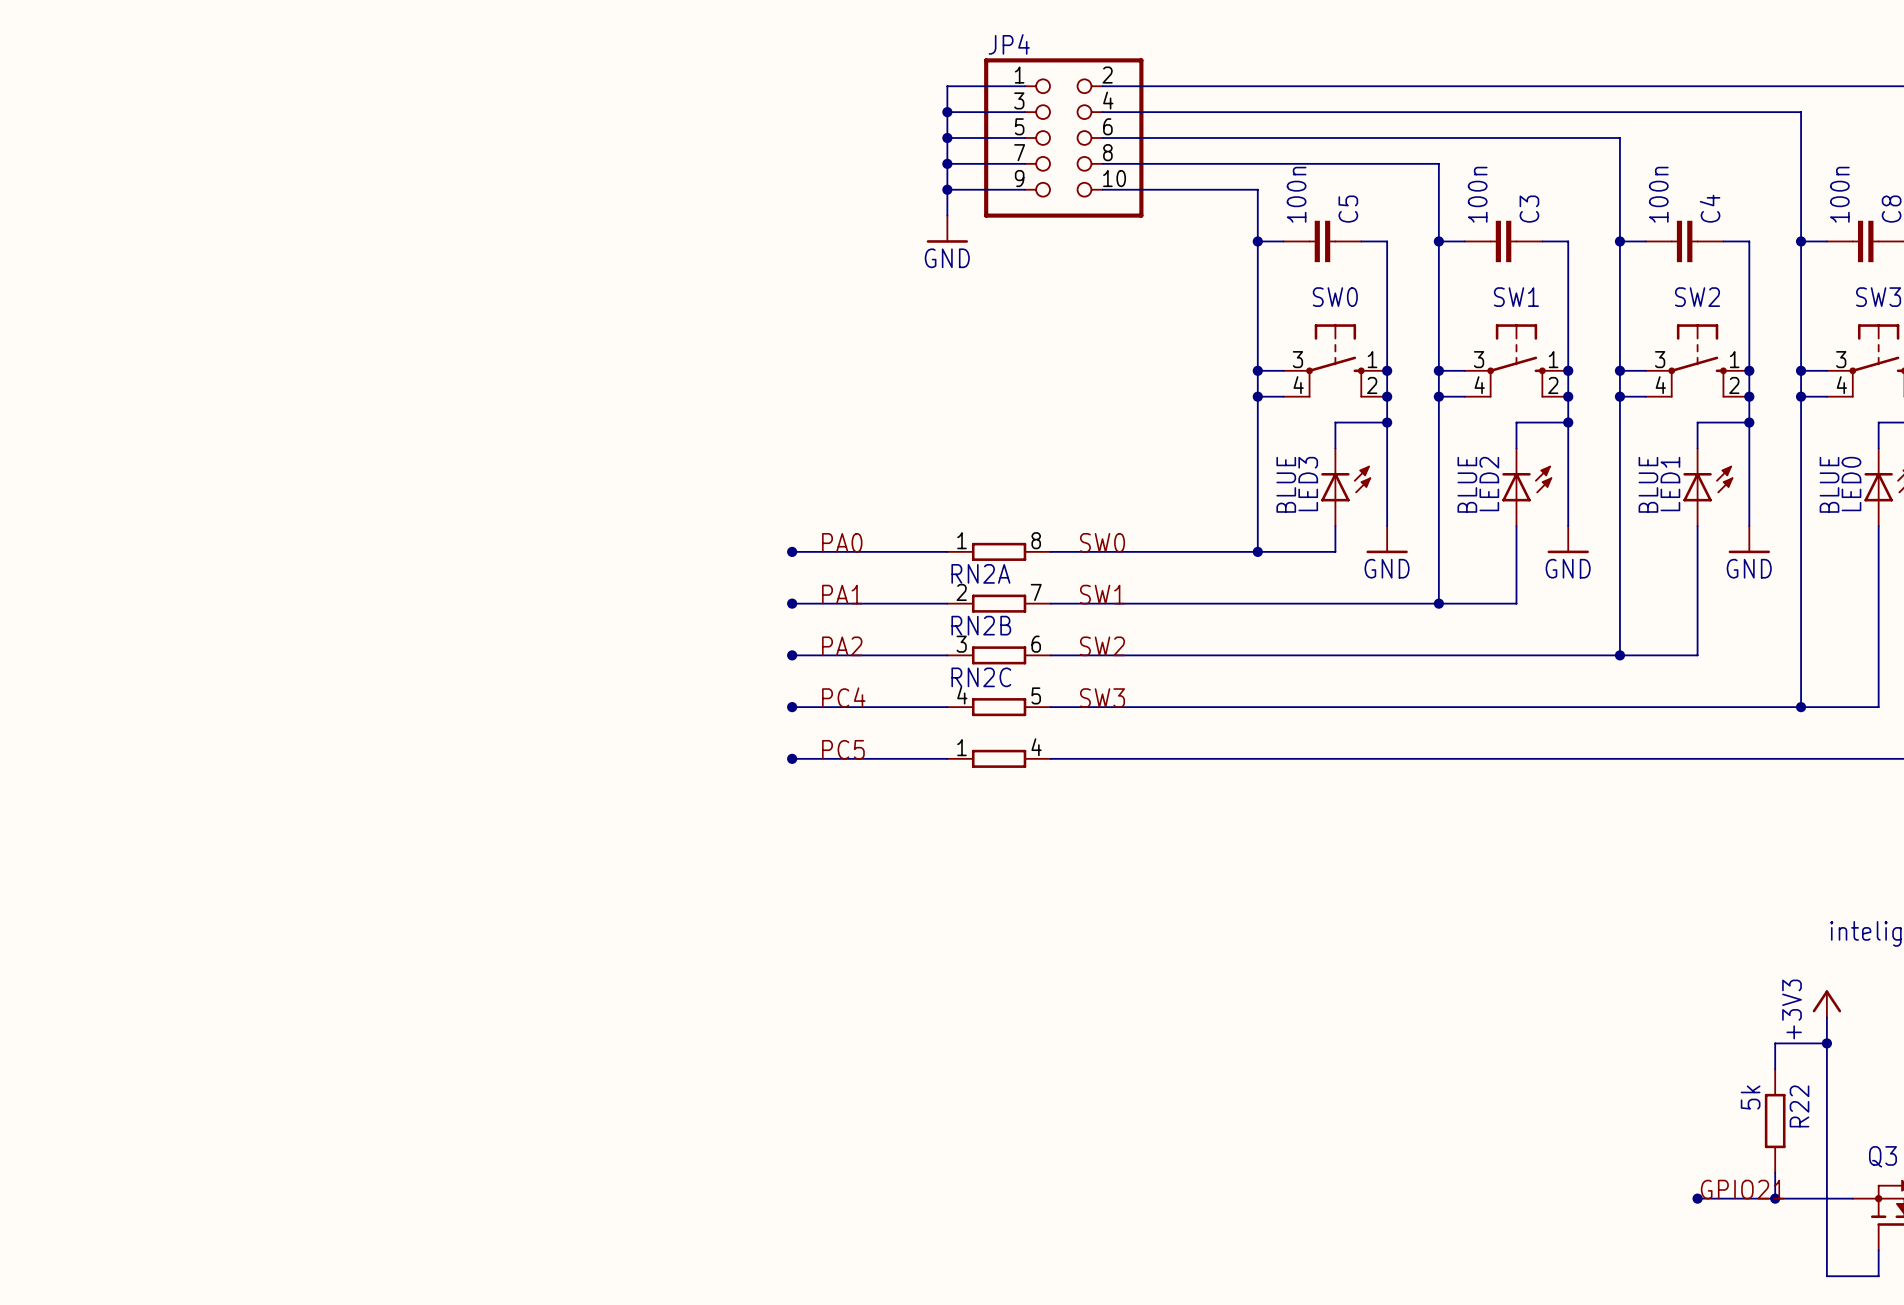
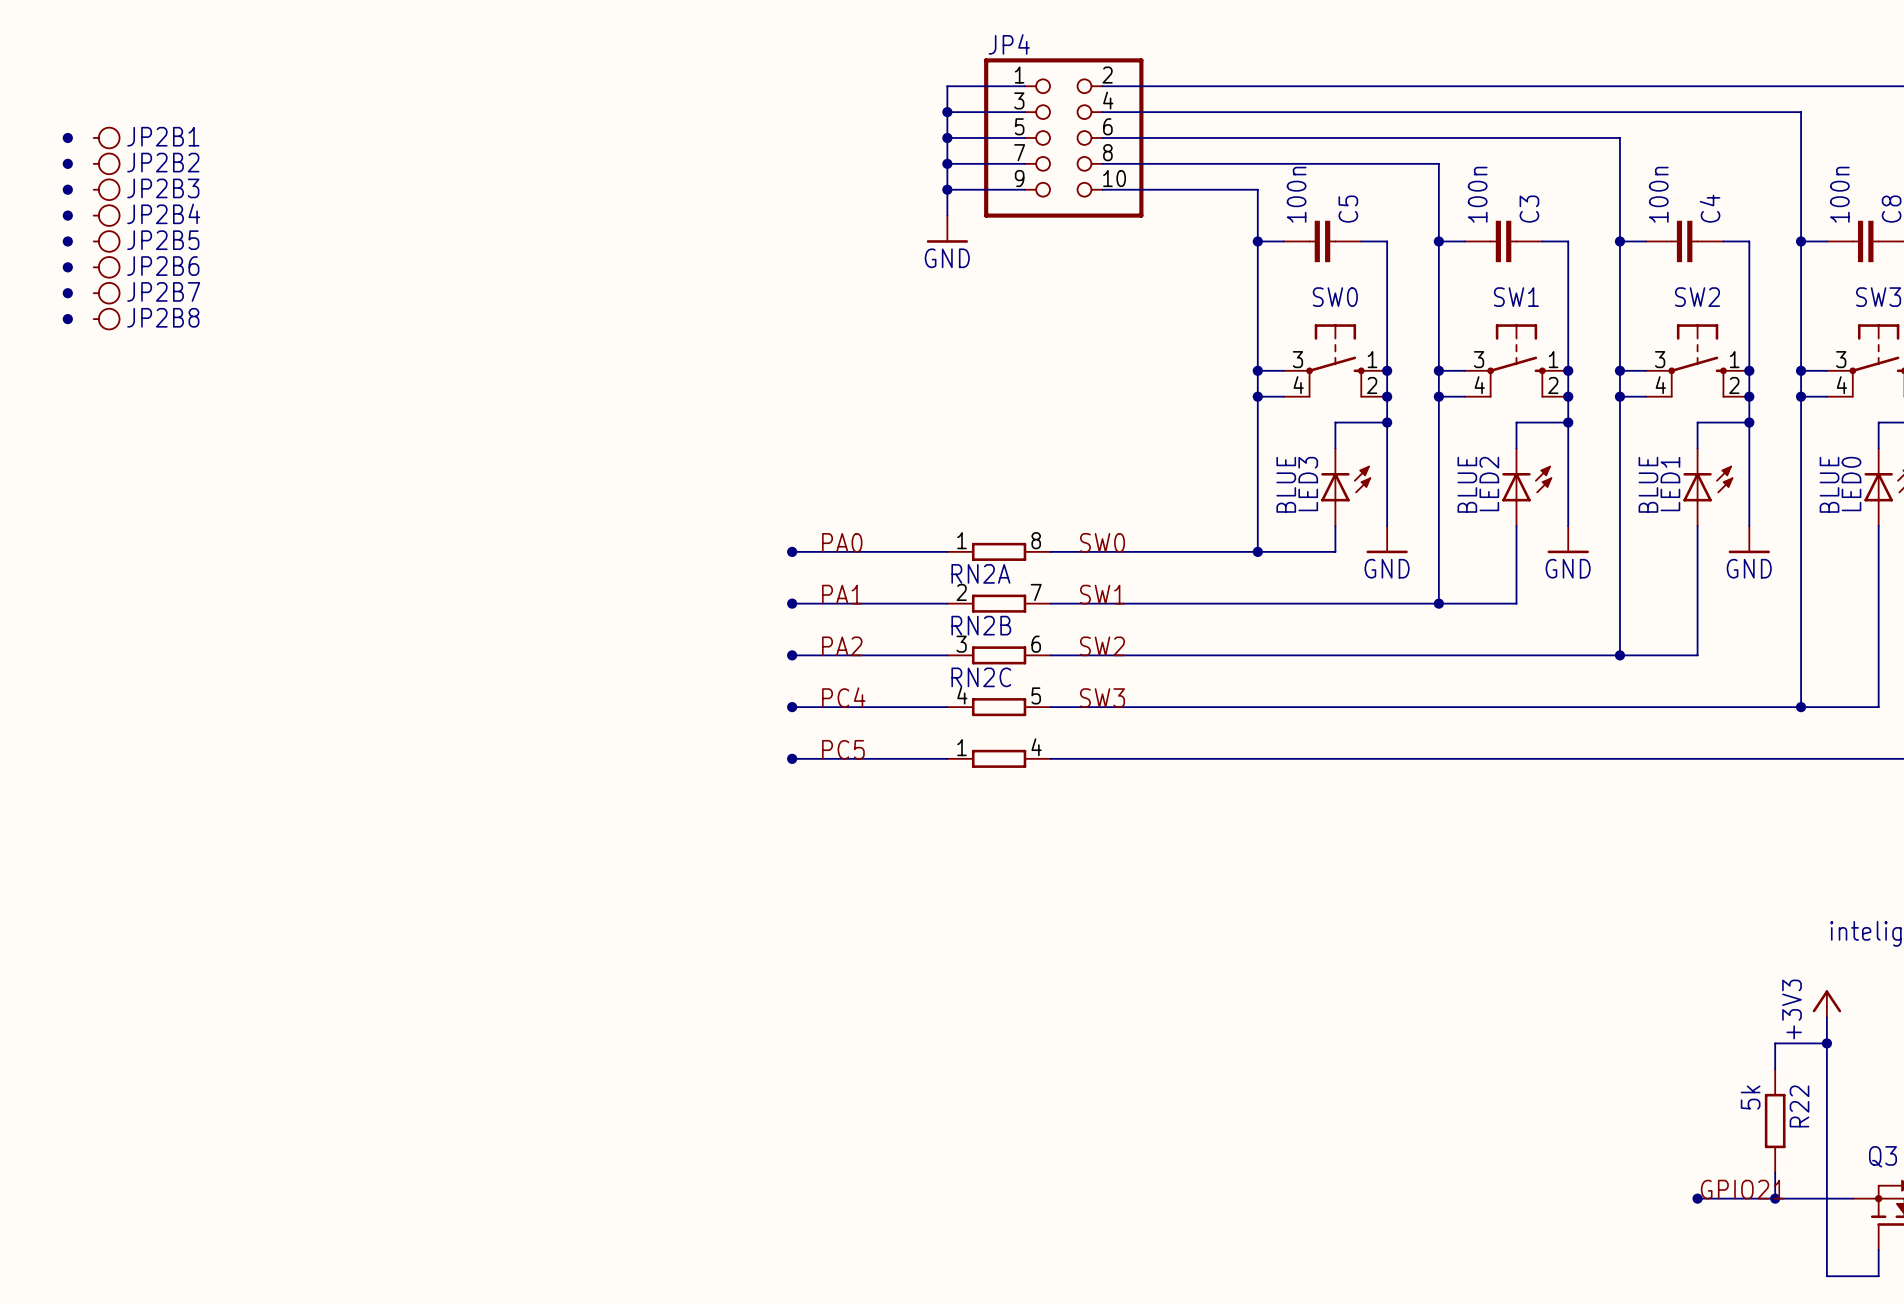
junction: none -> (67, 137)
JP2B1: none -> (106, 137)
junction: none -> (67, 163)
JP2B2: none -> (106, 163)
junction: none -> (67, 189)
JP2B3: none -> (106, 189)
junction: none -> (67, 215)
JP2B4: none -> (106, 215)
junction: none -> (67, 241)
JP2B5: none -> (106, 241)
junction: none -> (67, 267)
JP2B6: none -> (106, 267)
junction: none -> (67, 293)
JP2B7: none -> (106, 293)
junction: none -> (67, 319)
JP2B8: none -> (106, 319)

